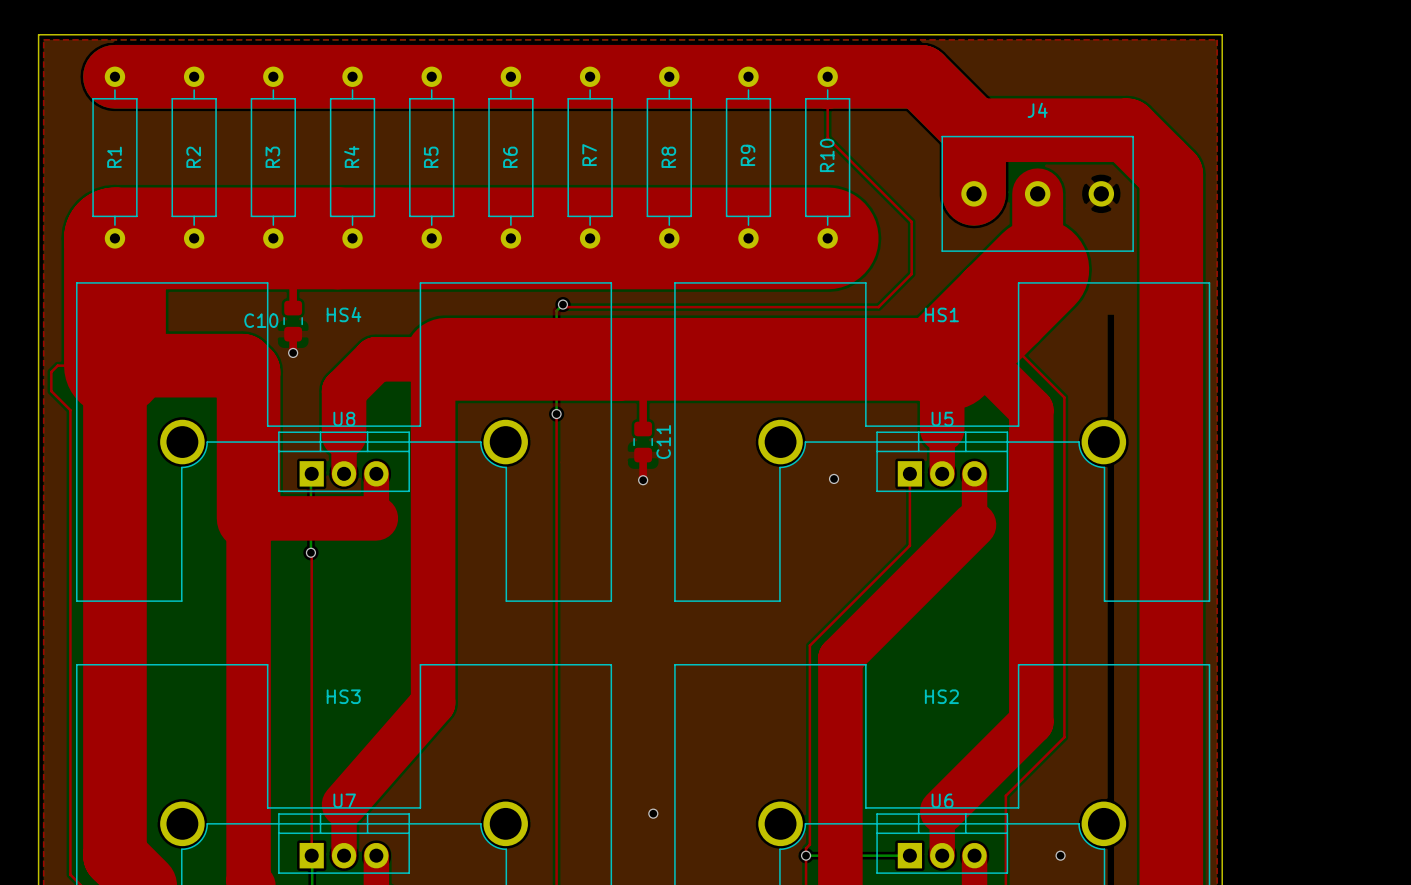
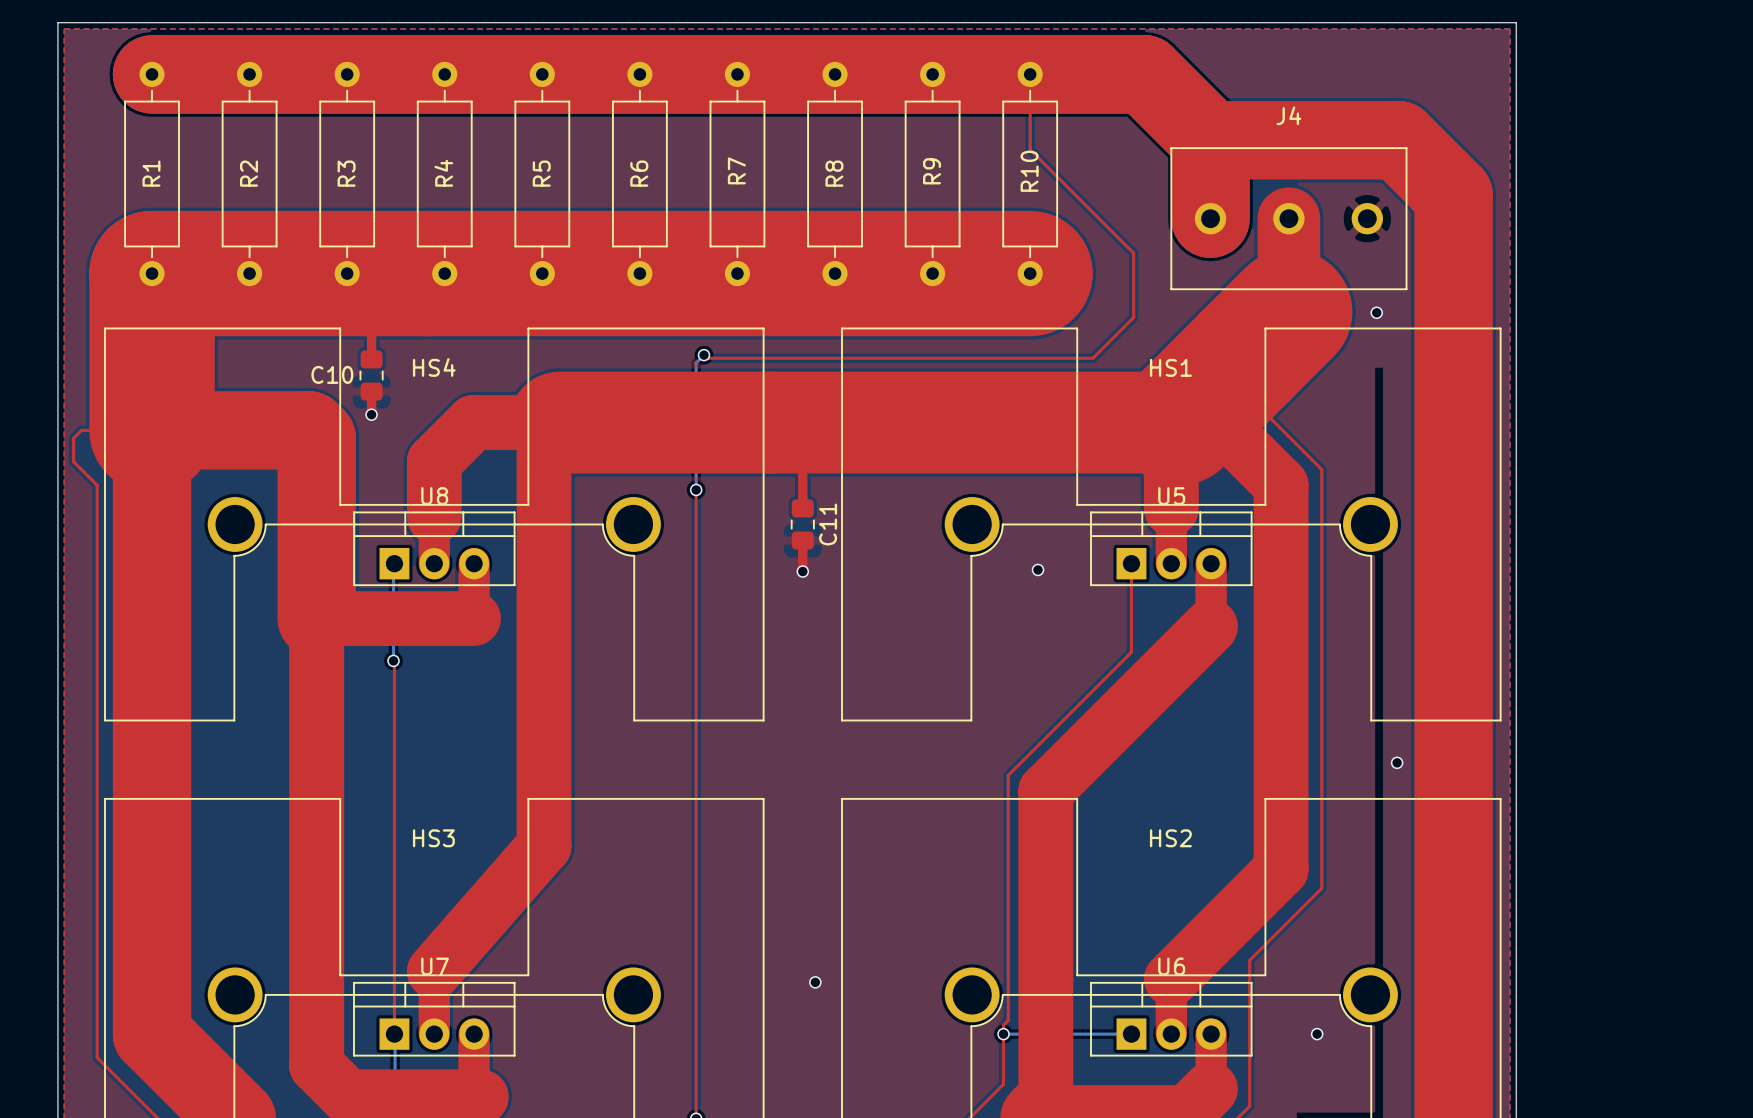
via: none -> (1376, 312)
via: none -> (1397, 762)

